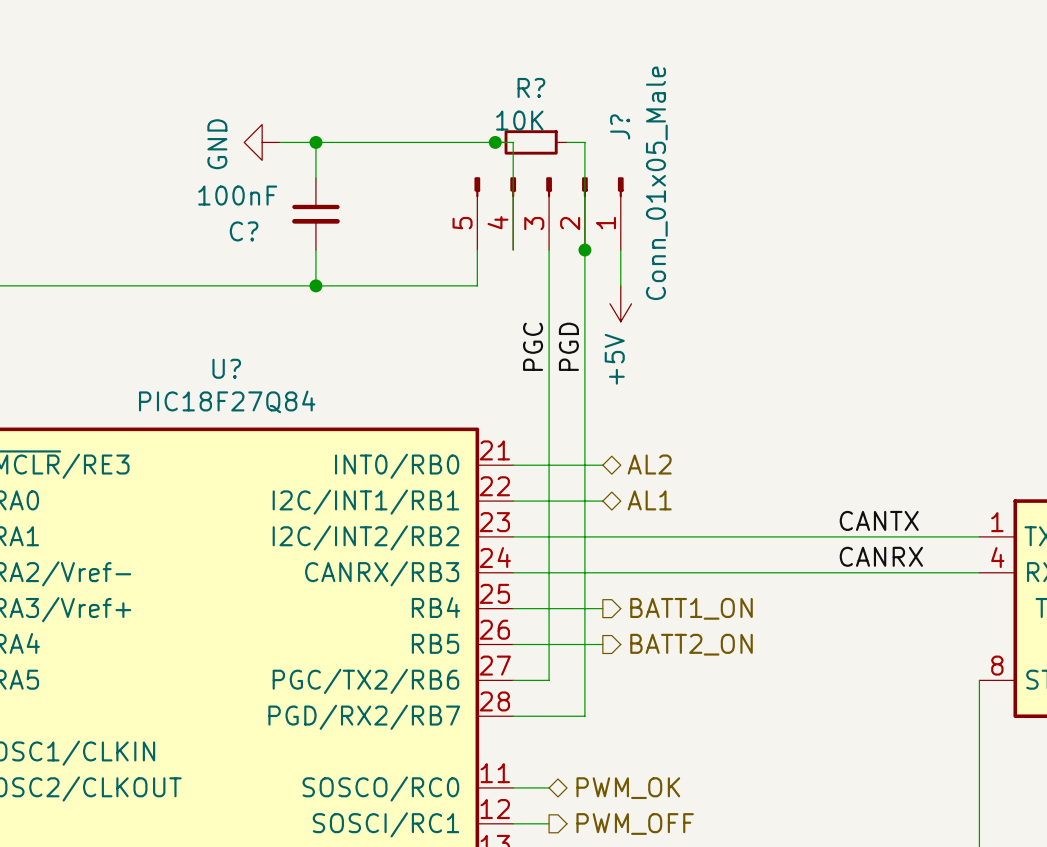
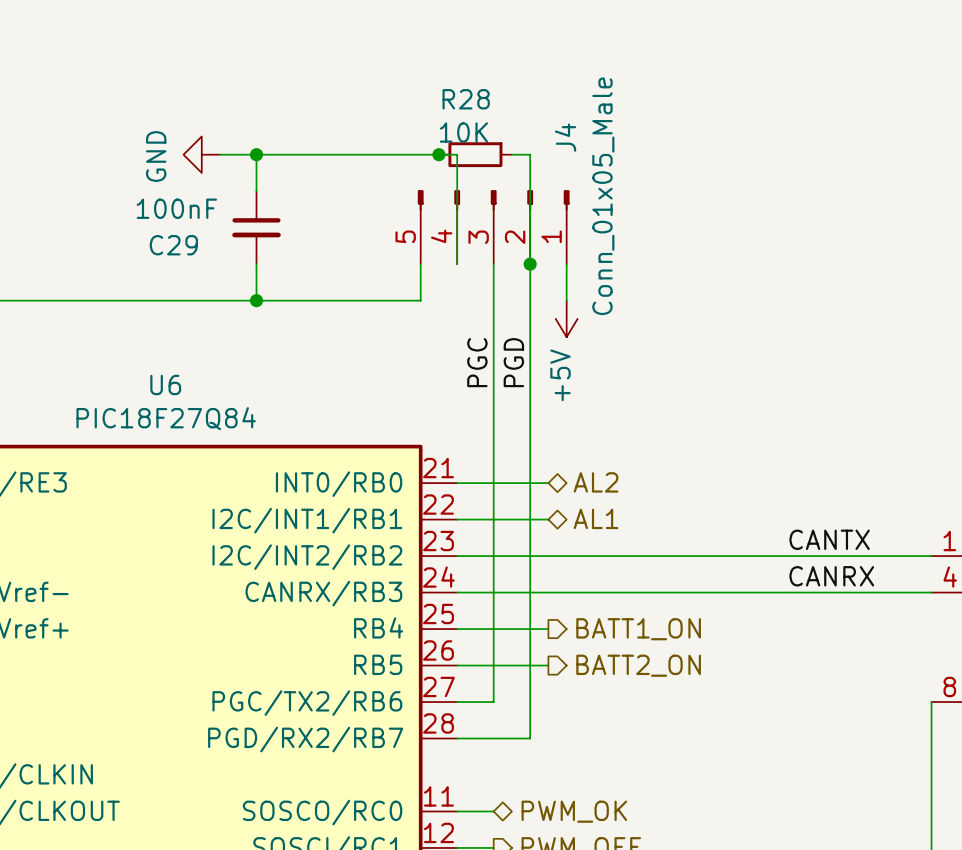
R? name: R? (531, 87) -> R28 (466, 99)
J? name: J? (620, 126) -> J4 (565, 137)
C? name: C? (244, 231) -> C29 (173, 245)
U? name: U? (226, 368) -> U6 (165, 384)

